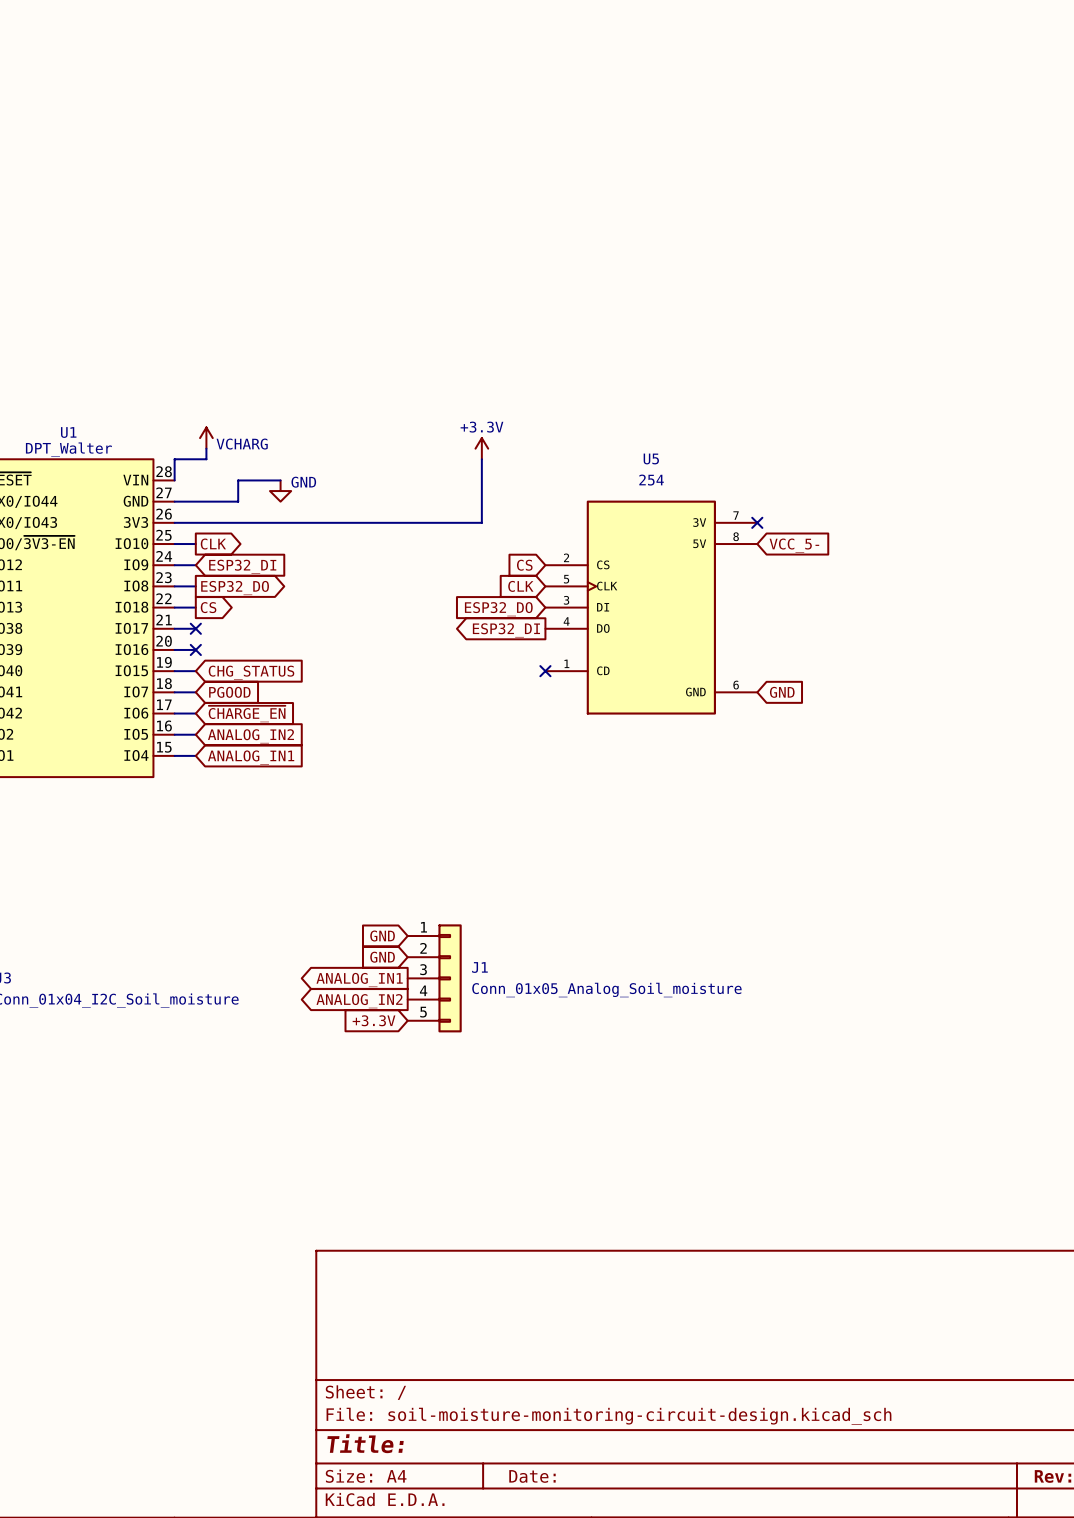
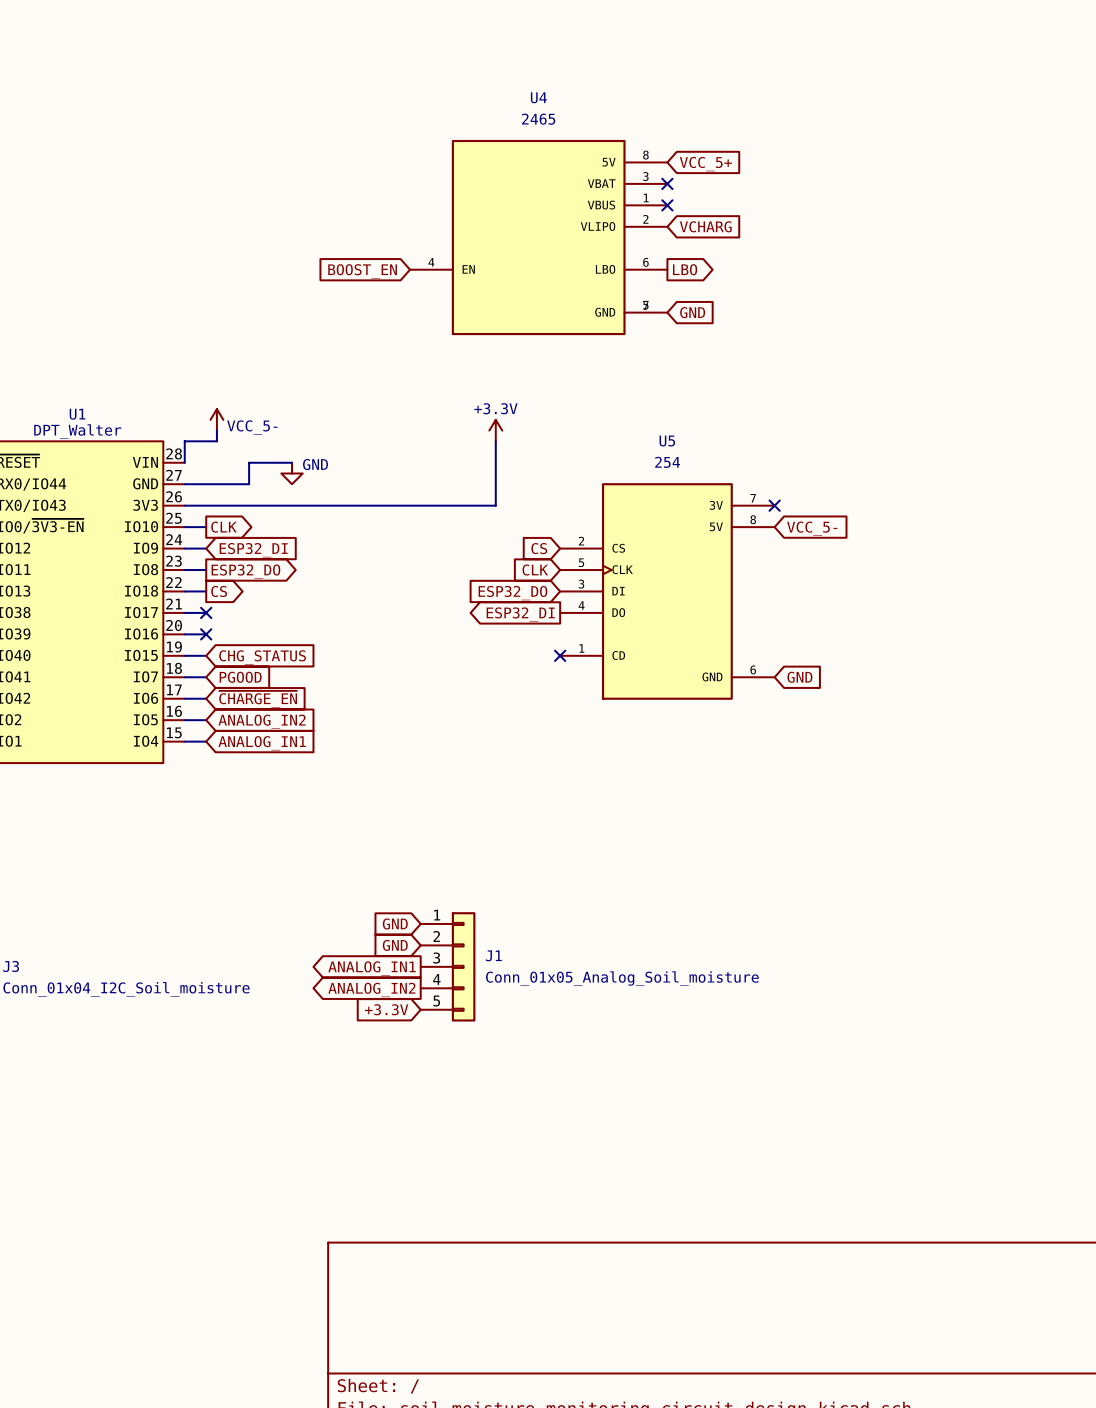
global label: none -> VCC_5+ (705, 164)
no-connect mark: none -> (667, 183)
no-connect mark: none -> (667, 205)
global label: none -> VCHARG (705, 226)
U4: none -> 2465 (538, 237)
global label: none -> LBO (685, 269)
global label: none -> BOOST_EN (362, 271)
global label: none -> GND (692, 312)
power symbol: VCHARG (206, 438) -> VCC_5- (216, 419)

